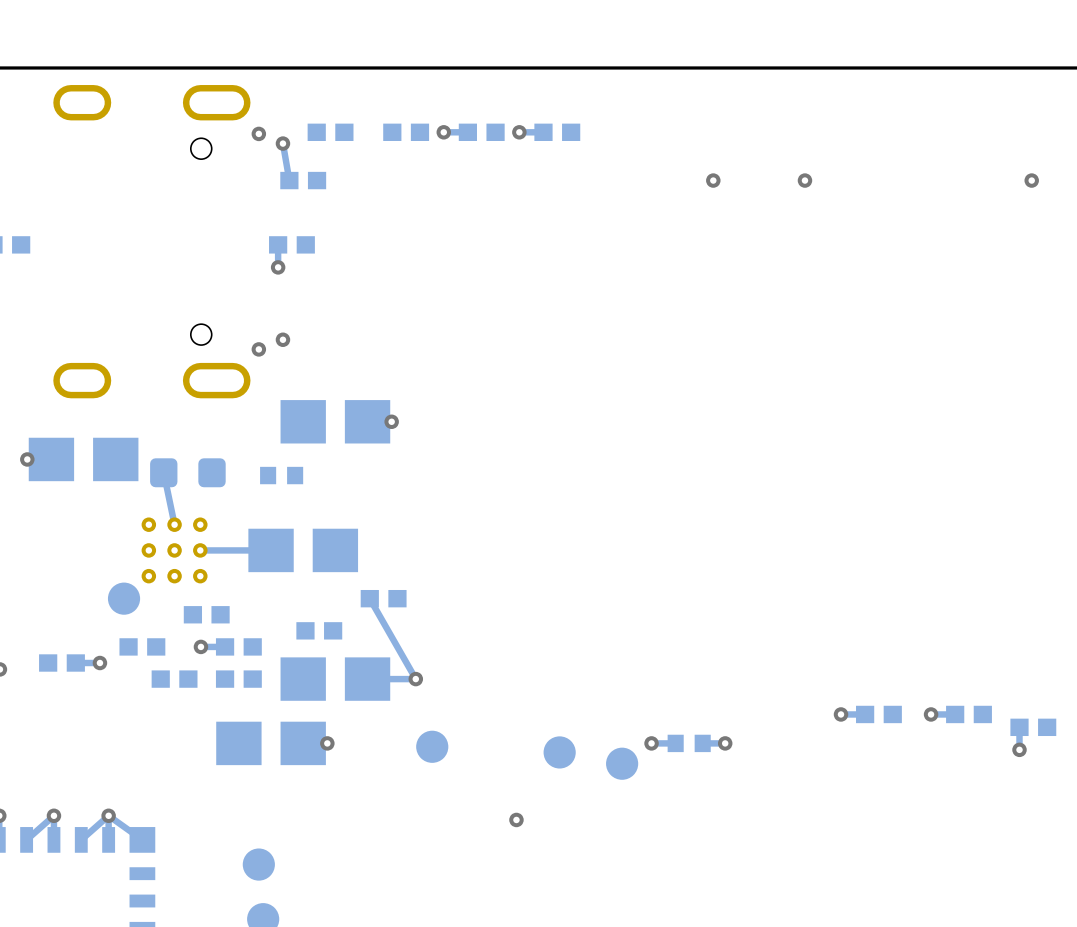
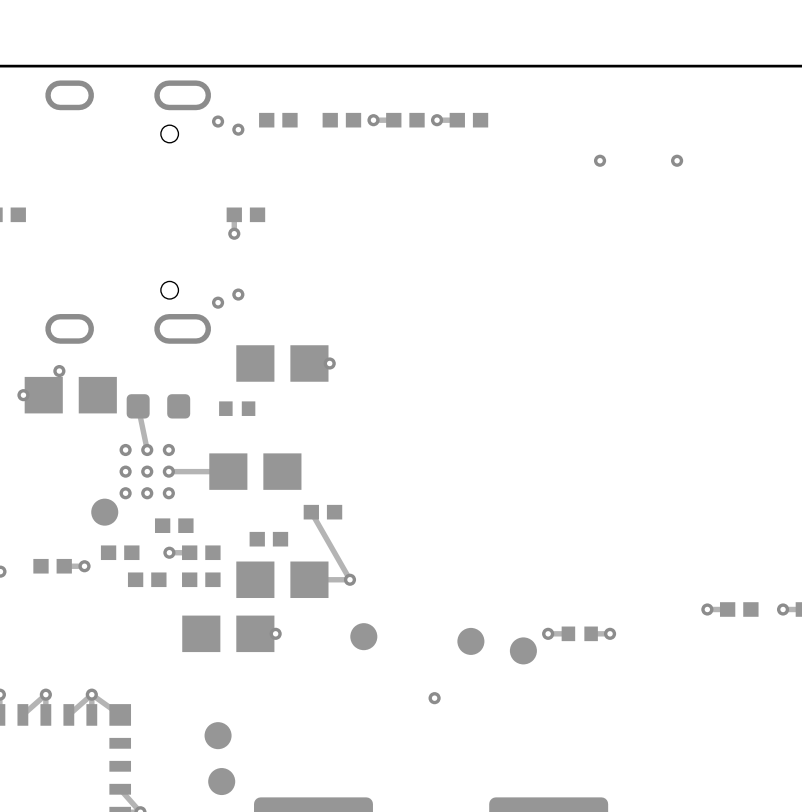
track: (282, 143) (289, 180) -> none
part: (303, 180) -> none
via: none -> (59, 371)

